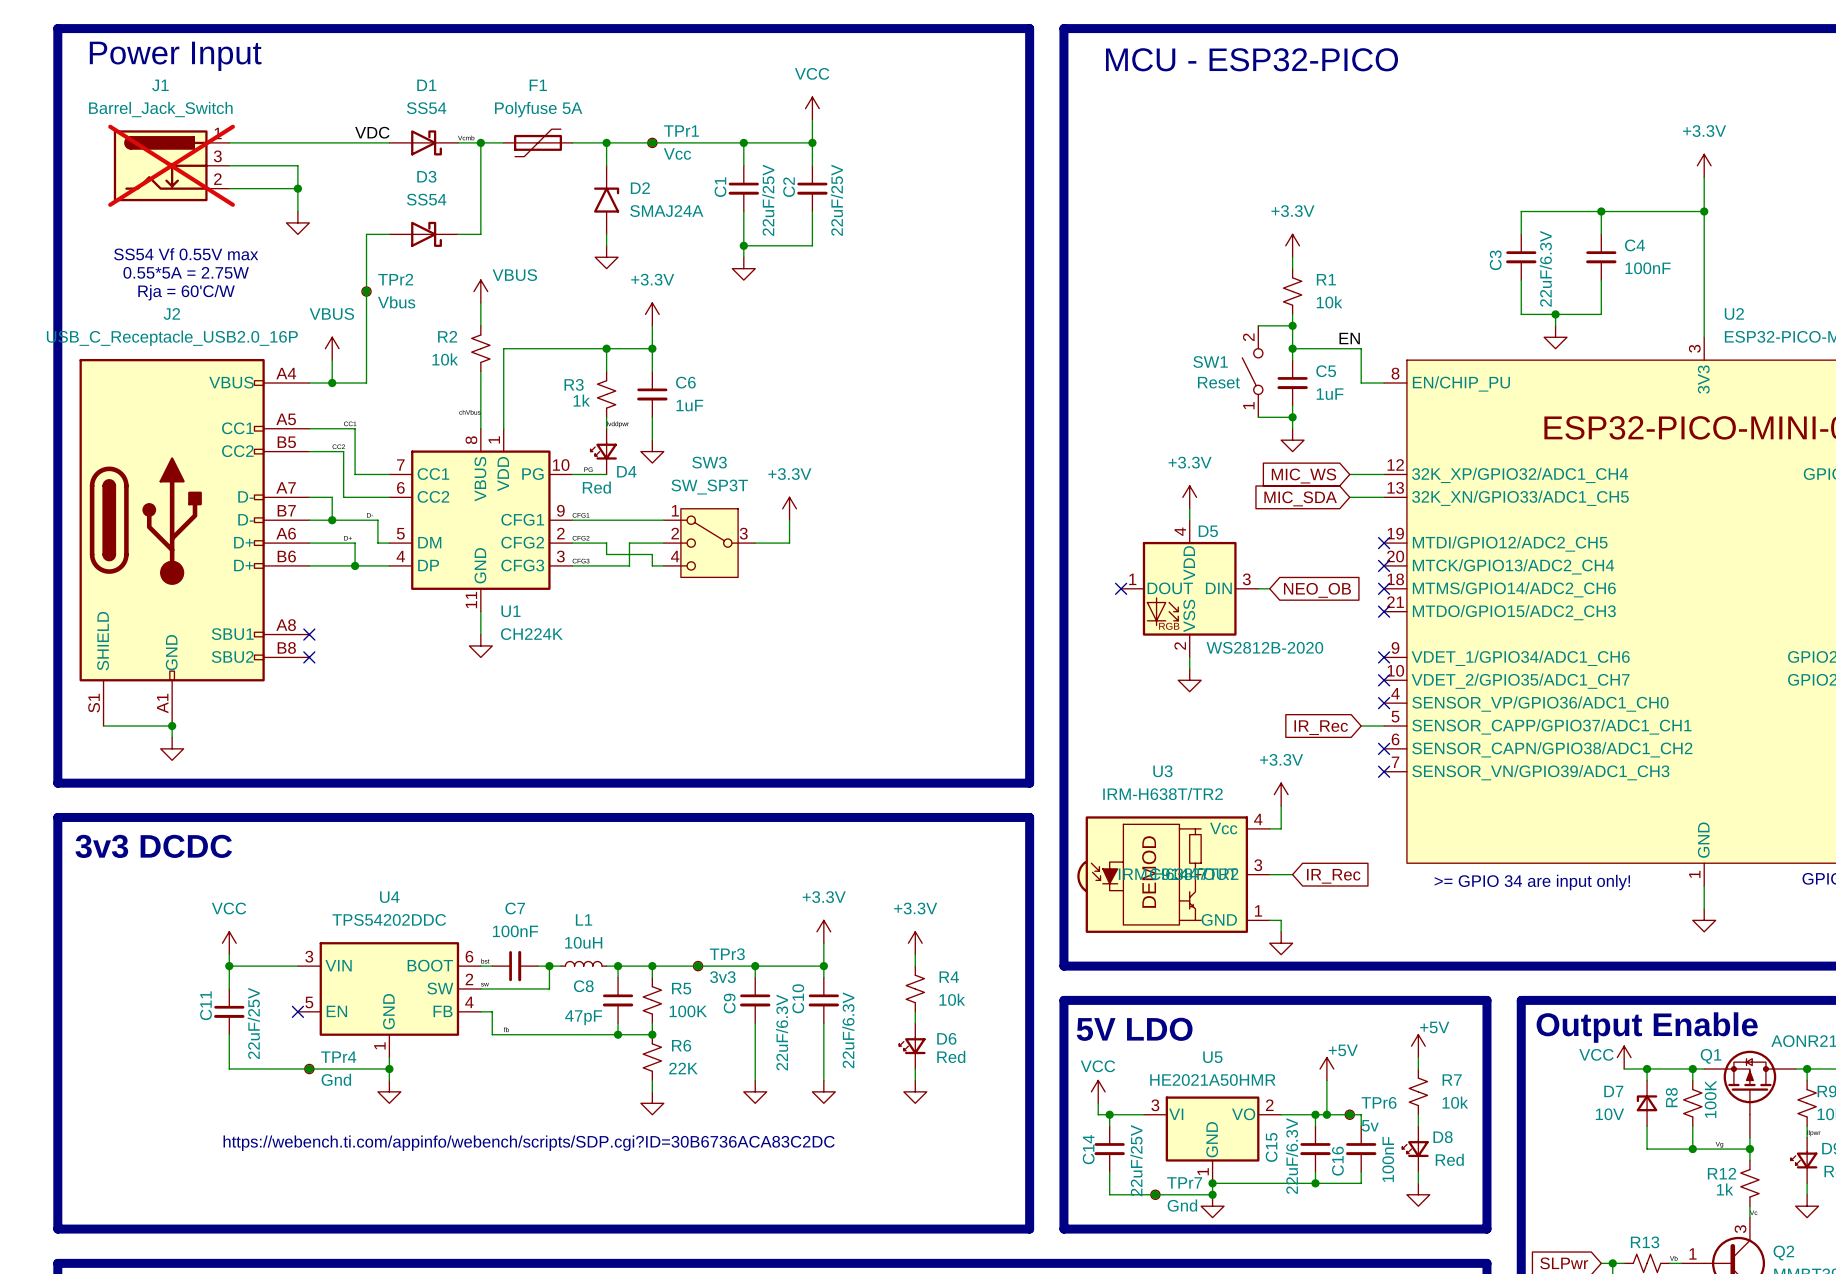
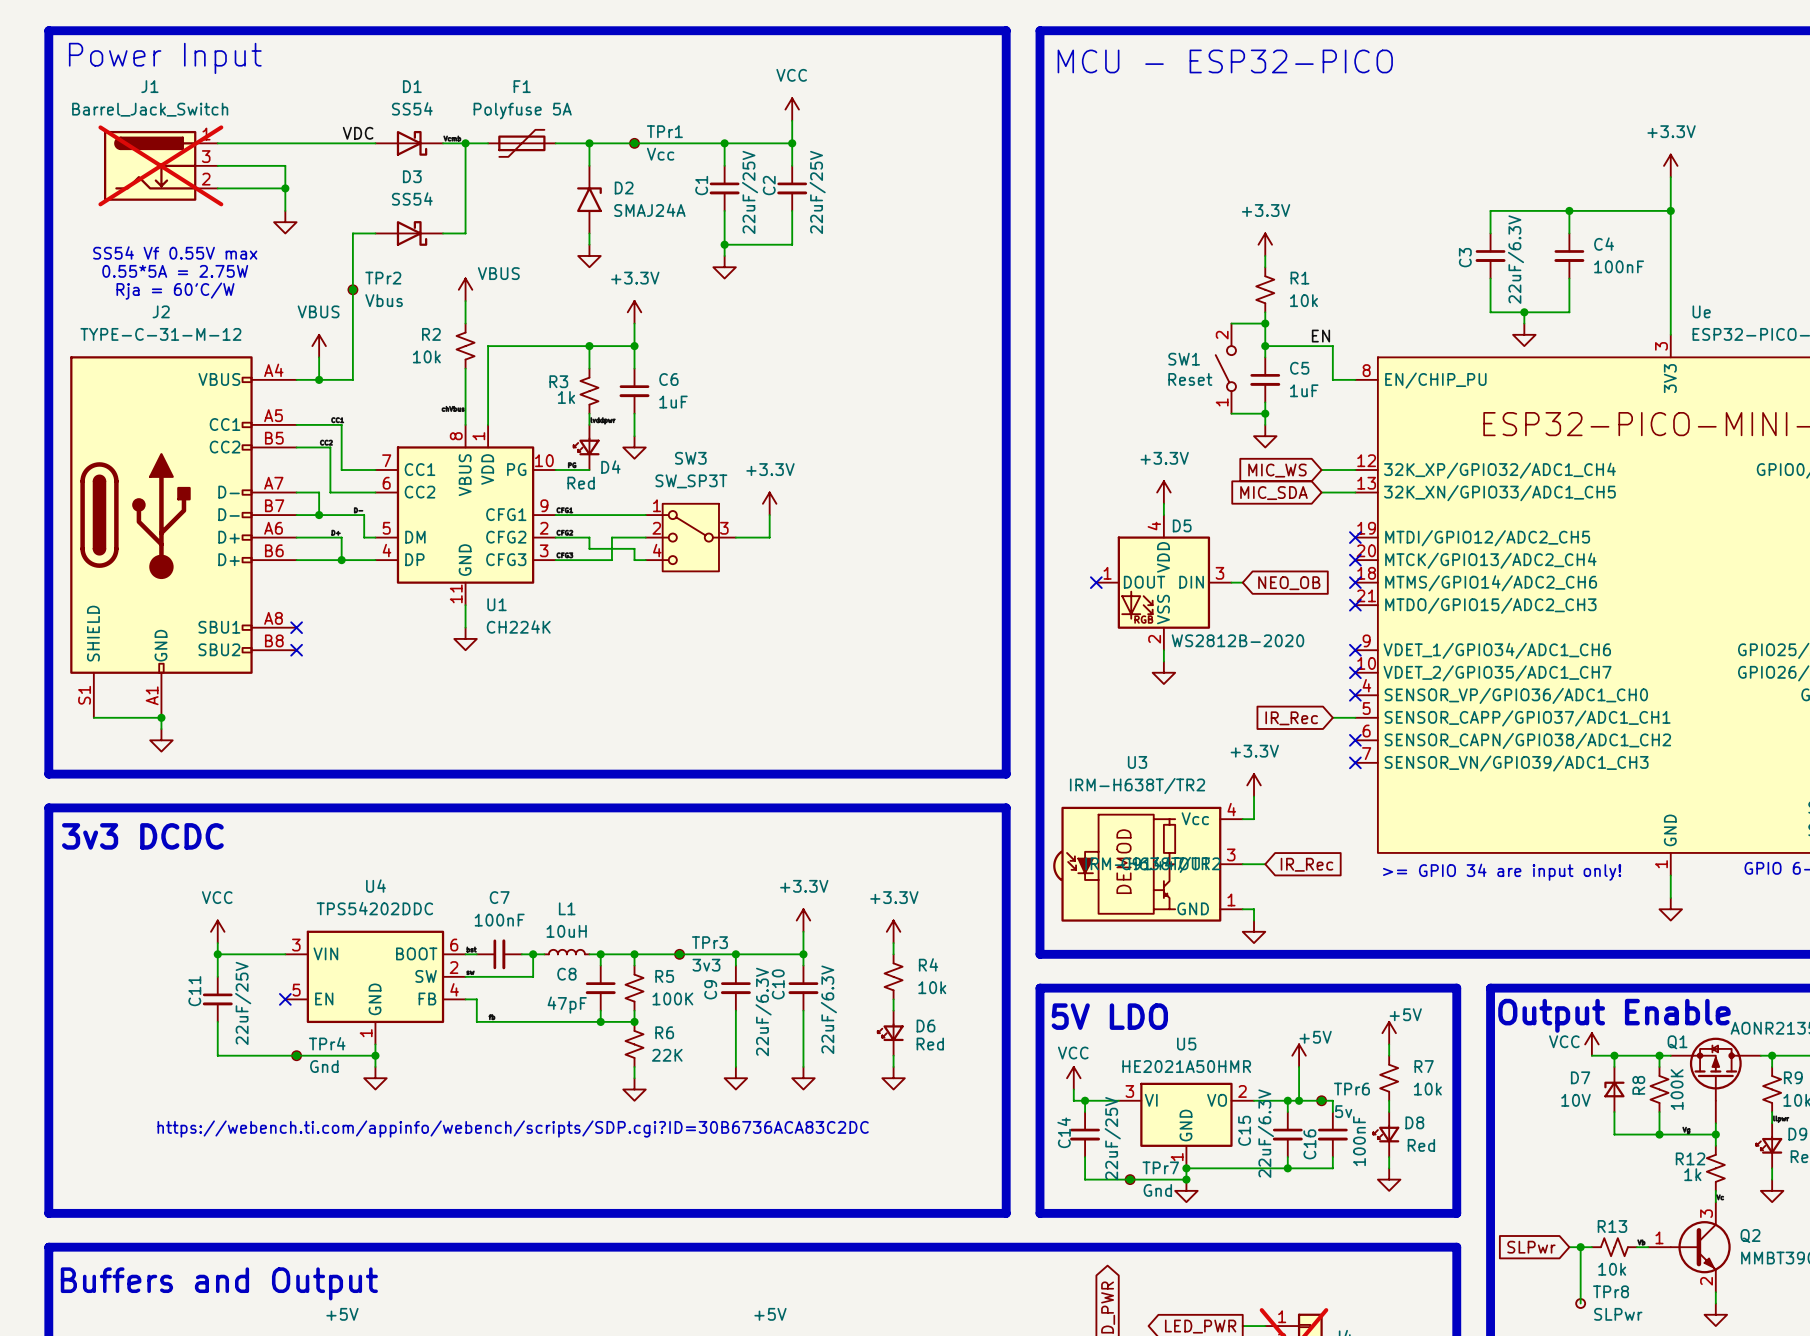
U2 name: U2 (1734, 313) -> Ue (1701, 311)
J2 value: USB_C_Receptacle_USB2.0_16P (172, 338) -> TYPE-C-31-M-12 (160, 334)

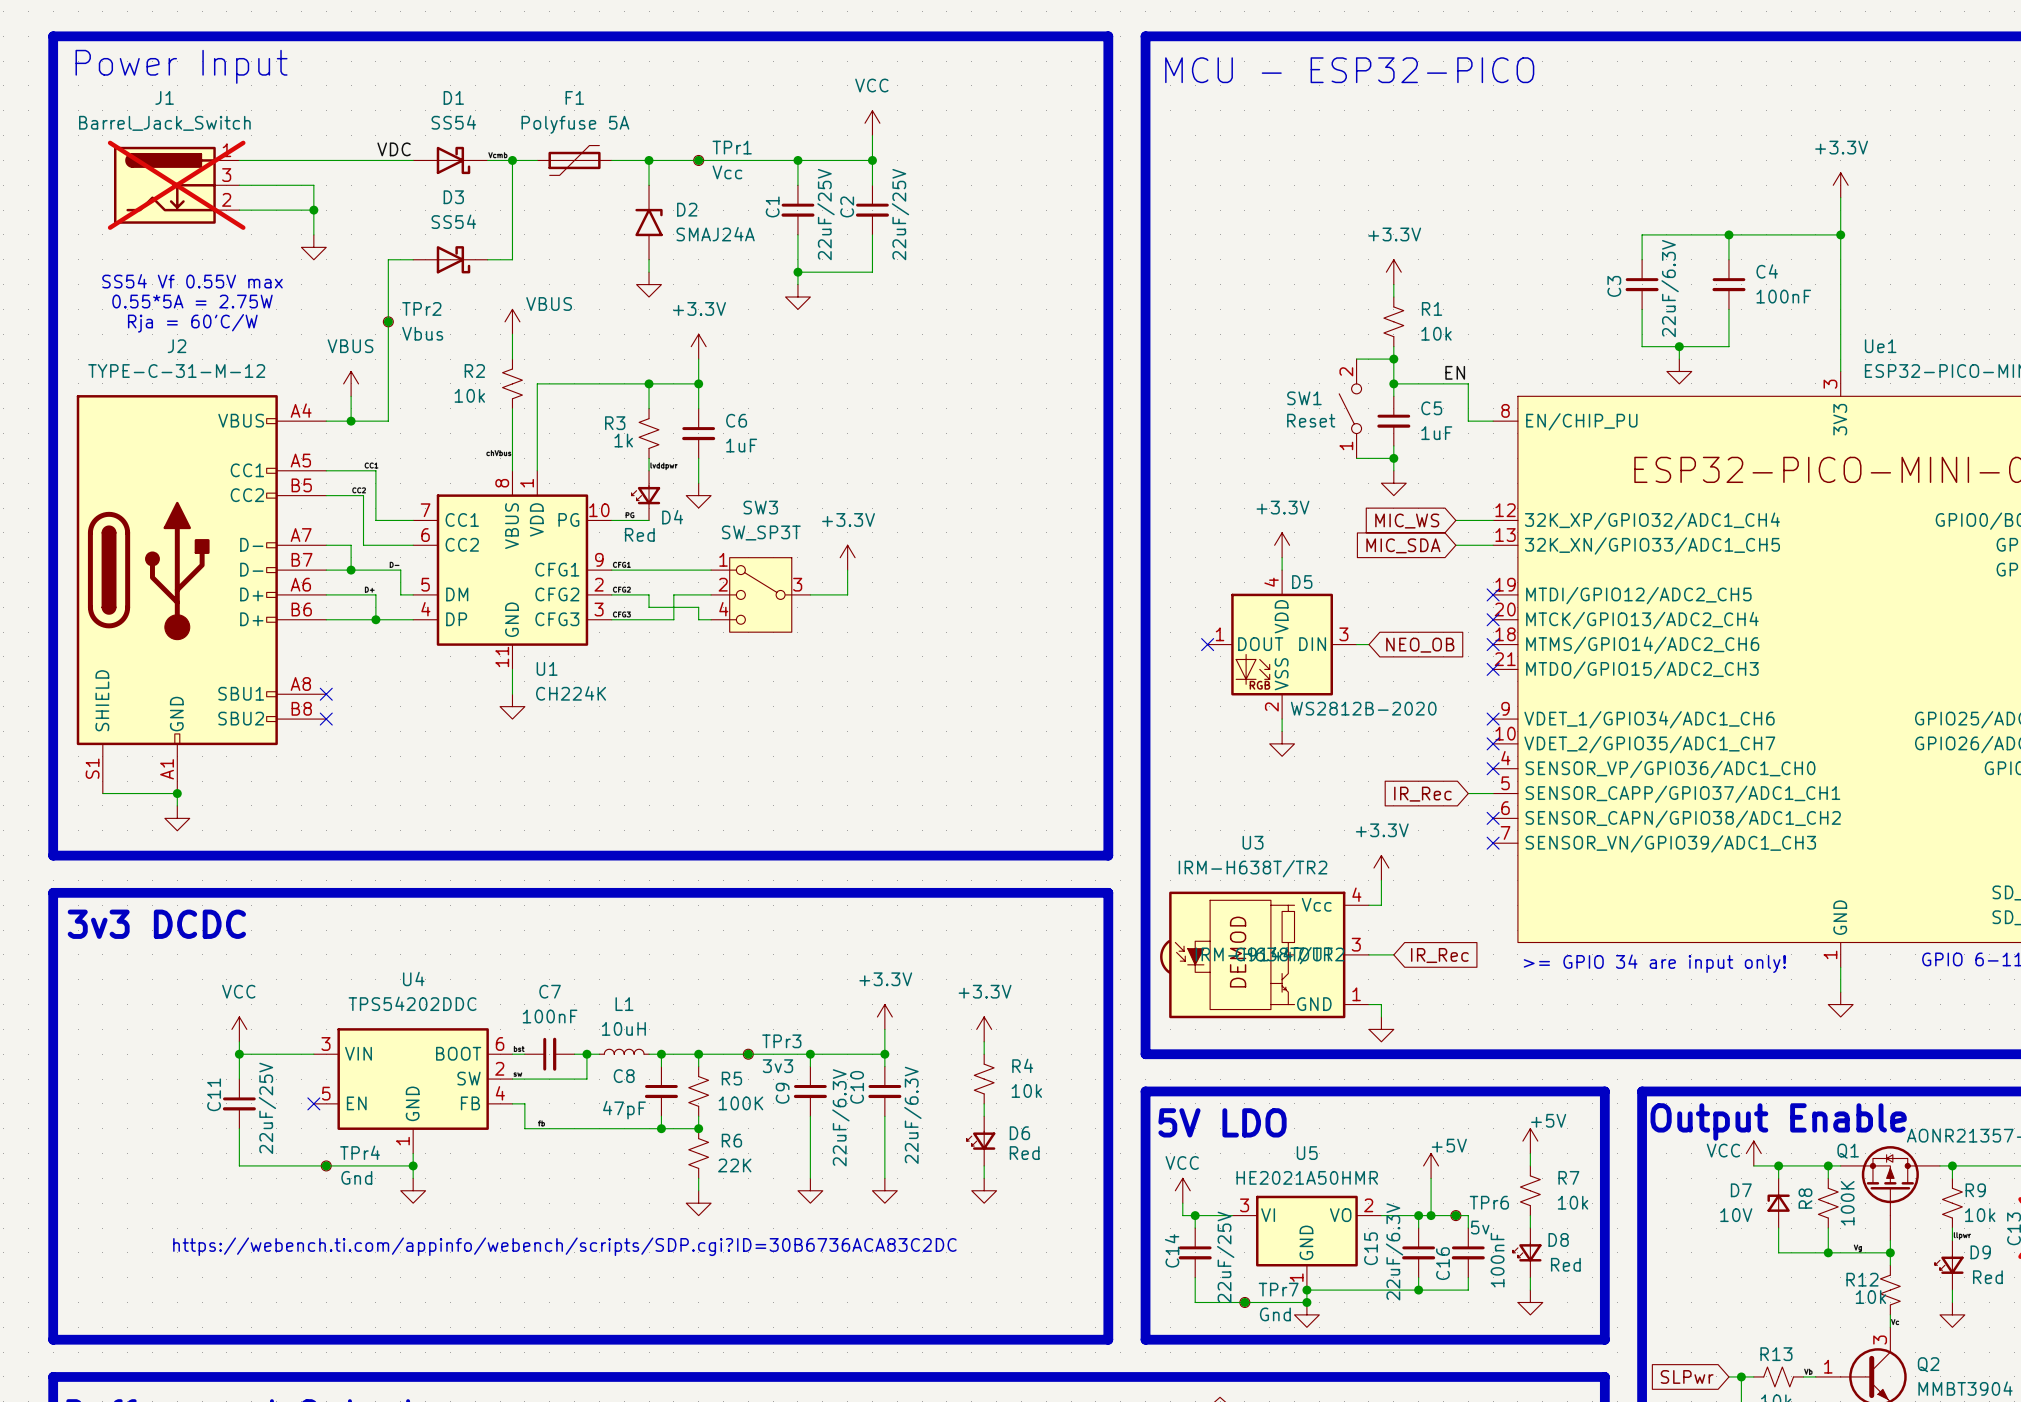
Ue name: Ue (1701, 311) -> Ue1 (1880, 346)
R12 value: 1k (1692, 1174) -> 10k (1870, 1297)

